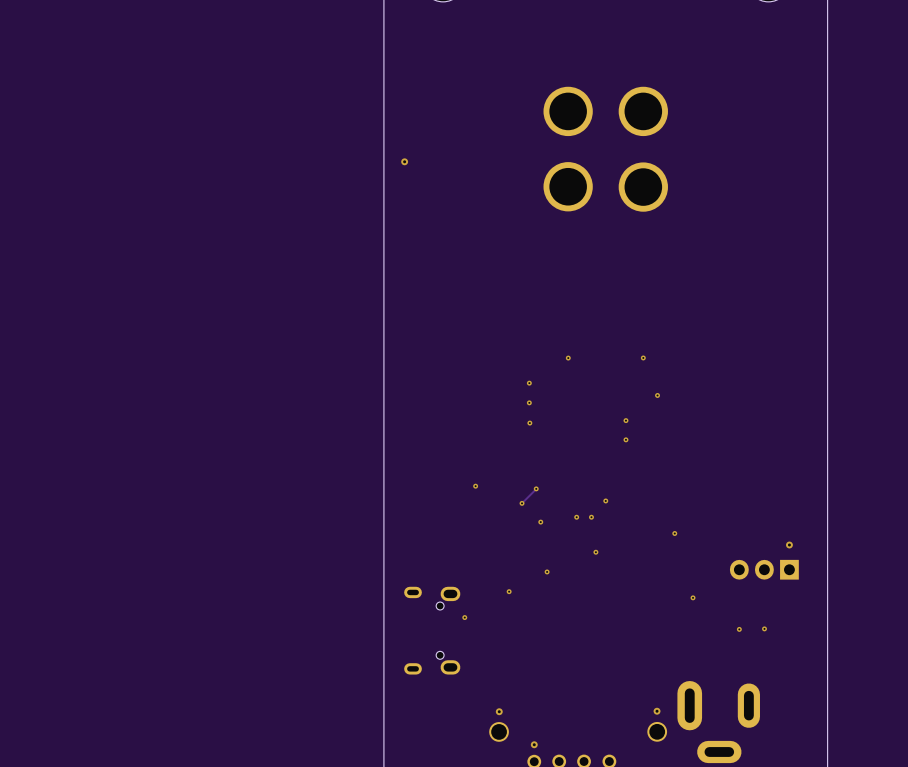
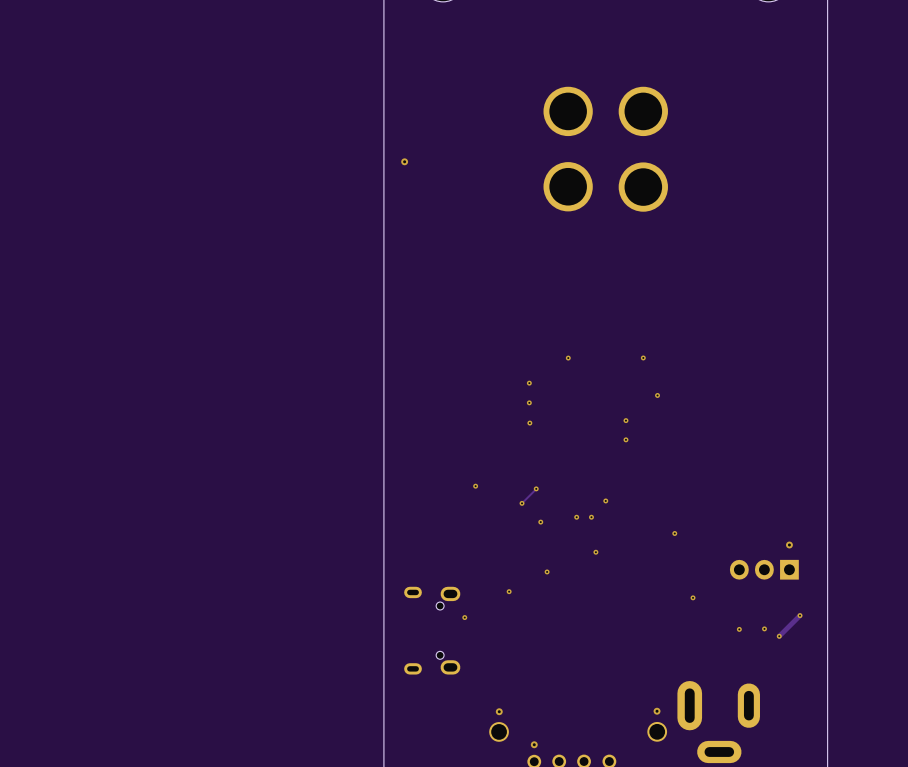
track: none -> (799, 615) (779, 636)
via: none -> (799, 615)
via: none -> (779, 636)

